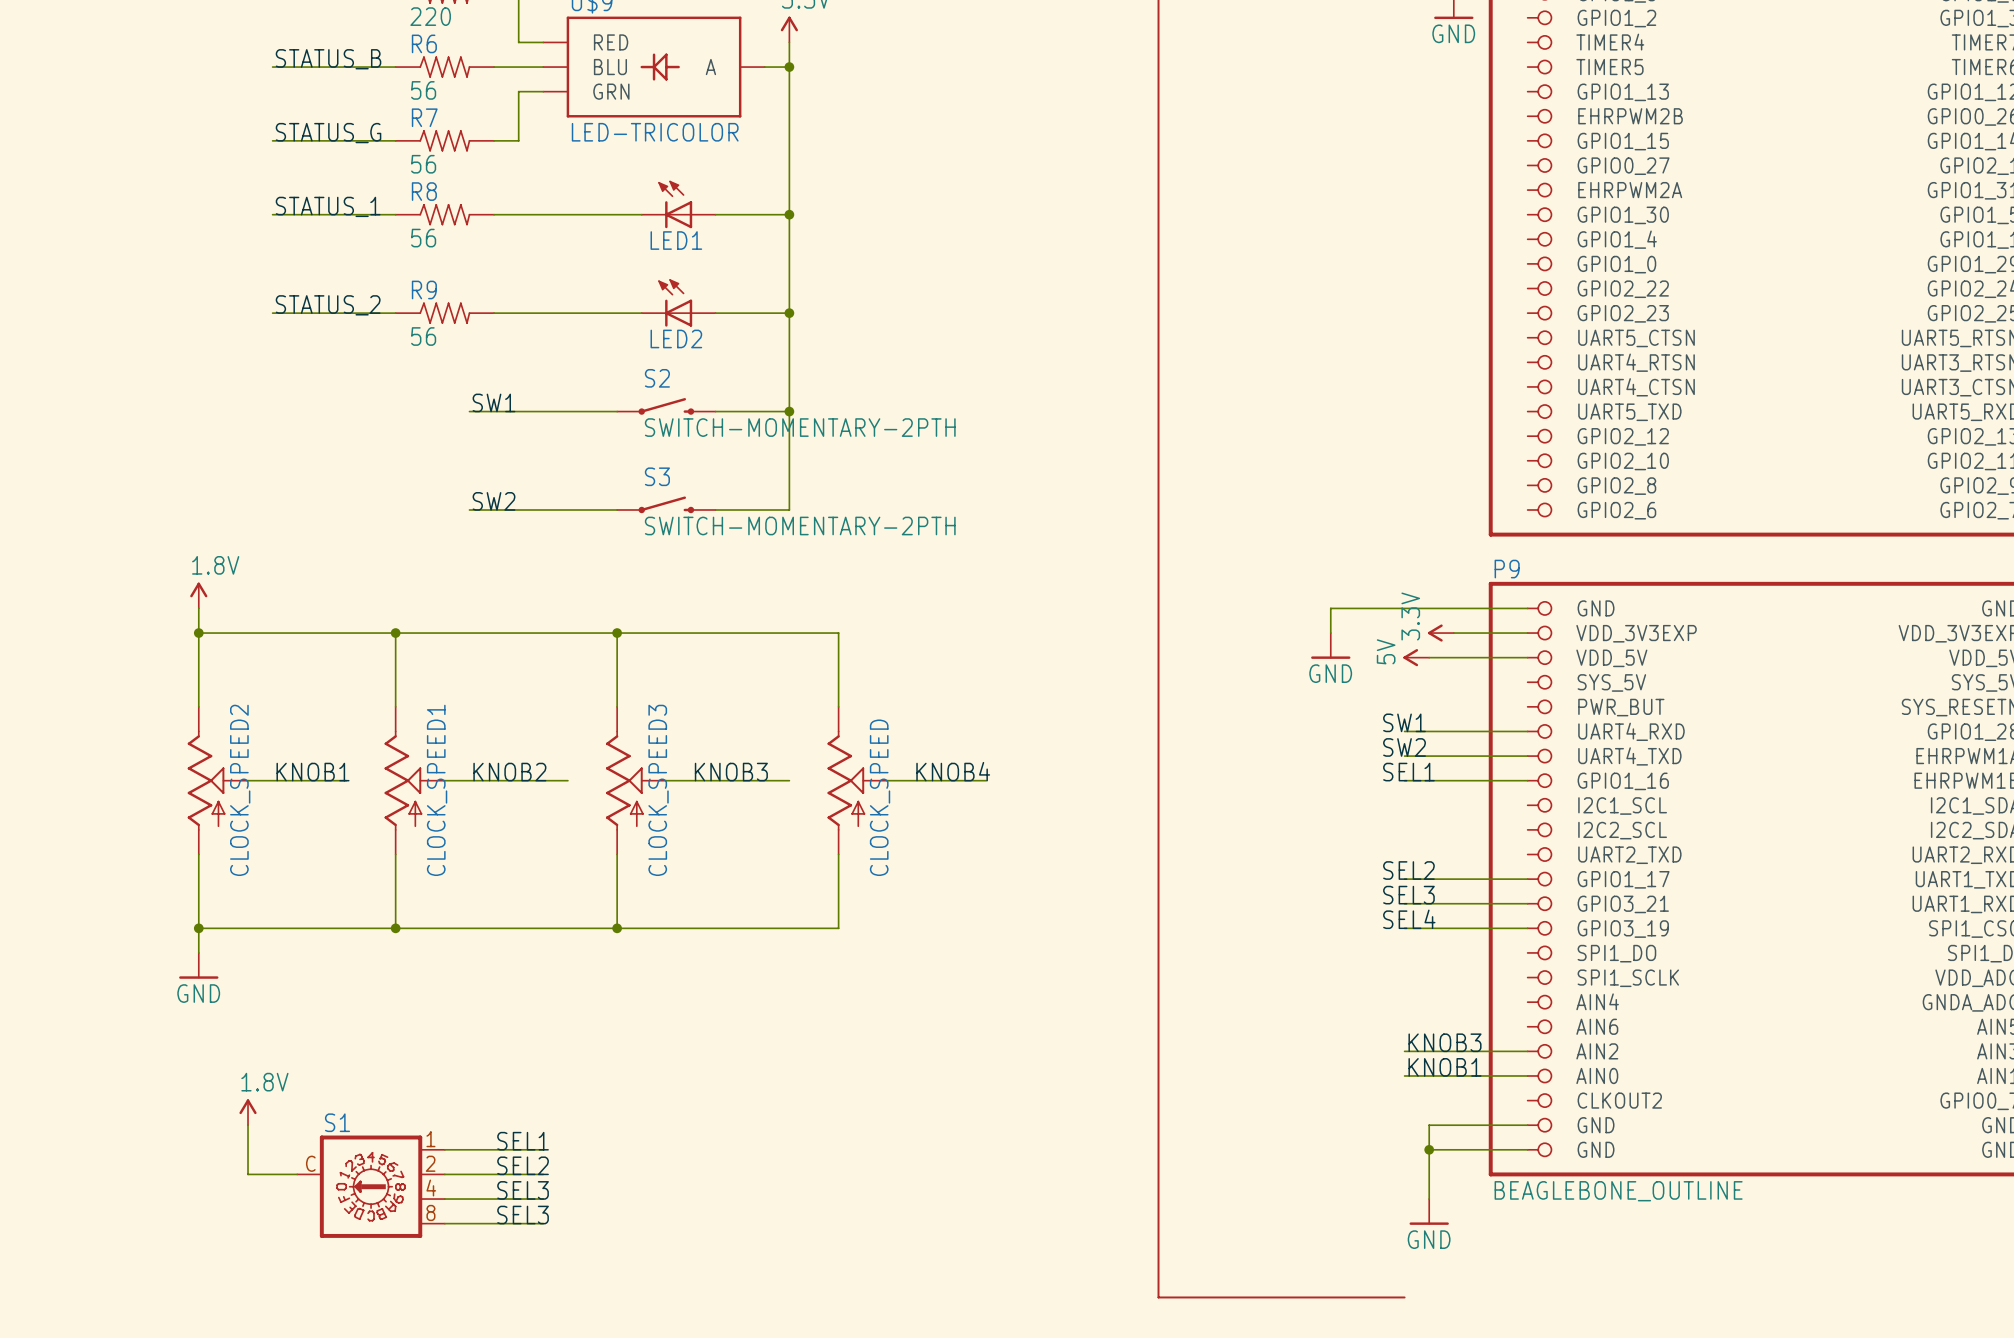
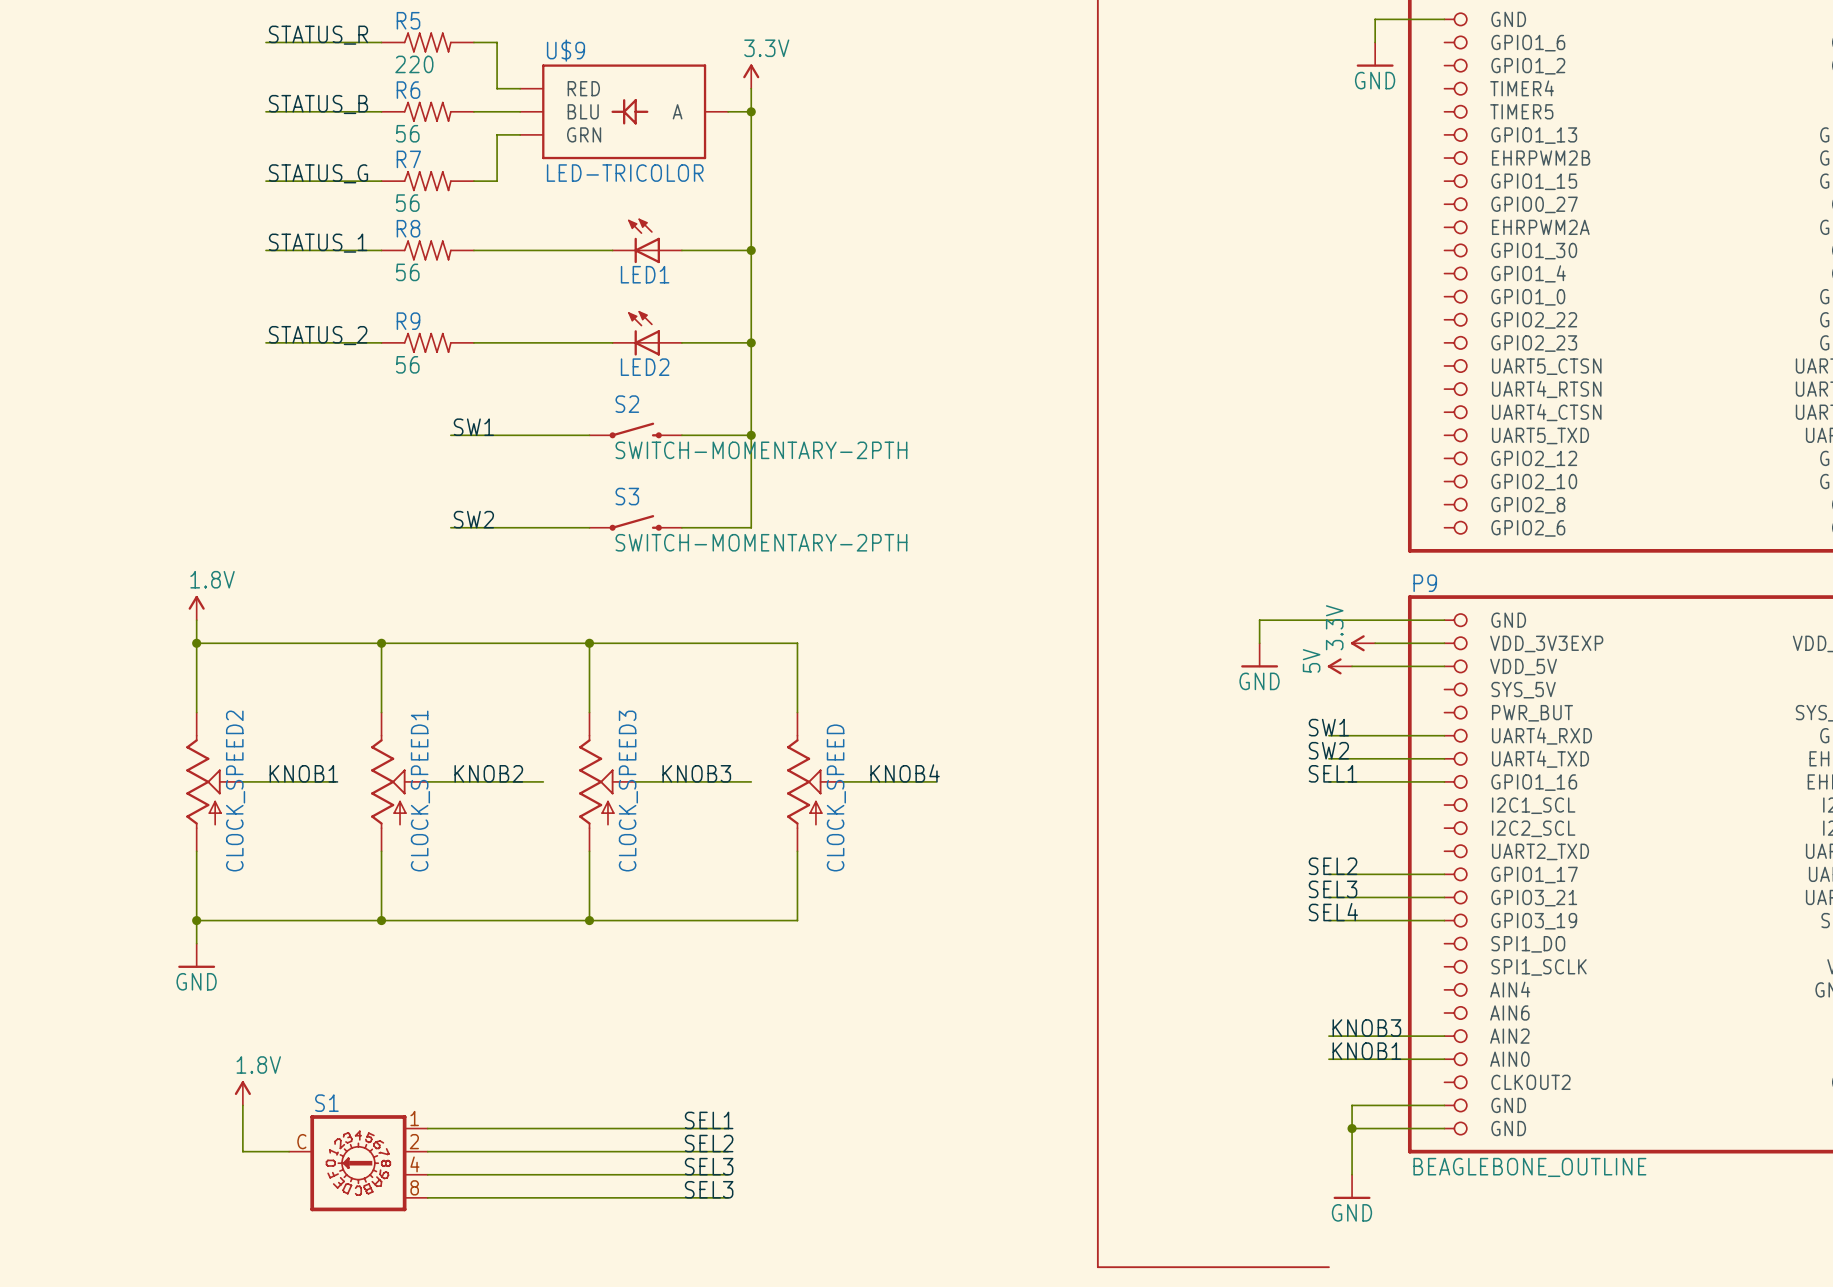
label position: SEL1 (523, 1141) -> SEL1 (709, 1120)
wire: none -> (520, 1128) (728, 1128)
label position: SEL2 (523, 1165) -> SEL2 (709, 1143)
wire: none -> (520, 1151) (728, 1151)
label: SEL3 (523, 1190) -> none
label: none -> SEL3 (709, 1166)
wire: none -> (520, 1174) (728, 1174)
label: SEL3 (523, 1215) -> none
label: none -> SEL3 (709, 1189)
wire: none -> (520, 1197) (728, 1197)

